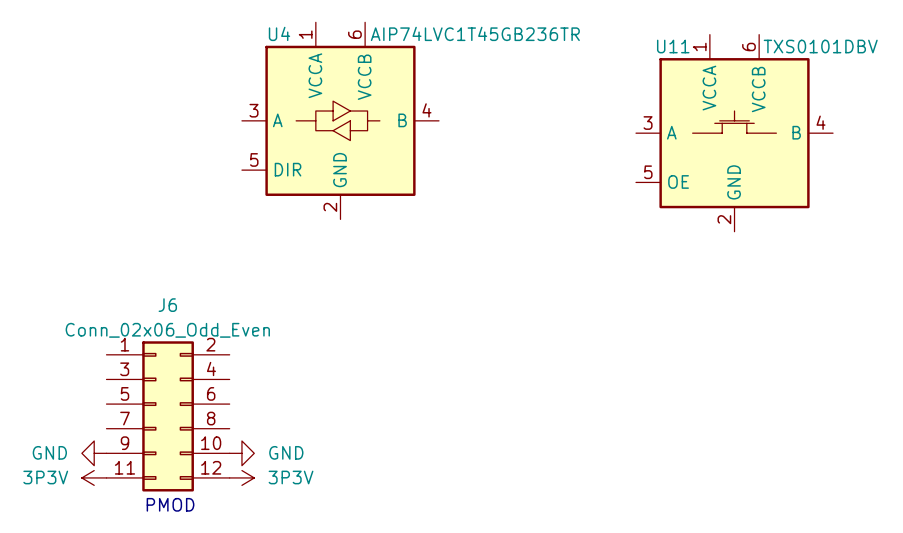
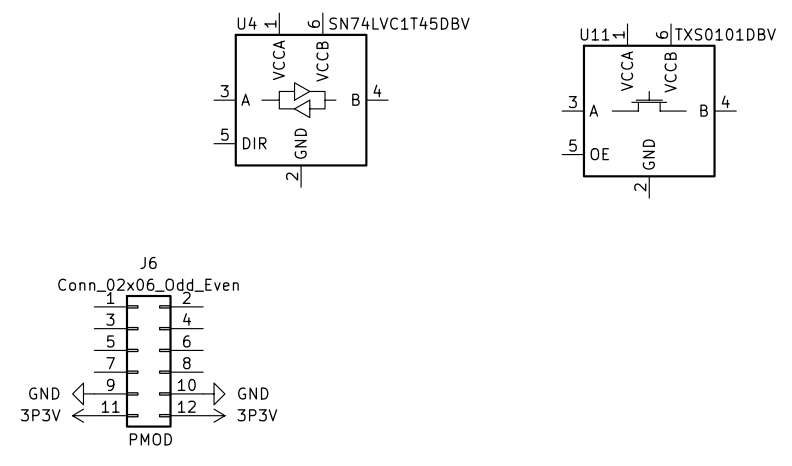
U4 value: AIP74LVC1T45GB236TR (475, 33) -> SN74LVC1T45DBV (399, 23)

